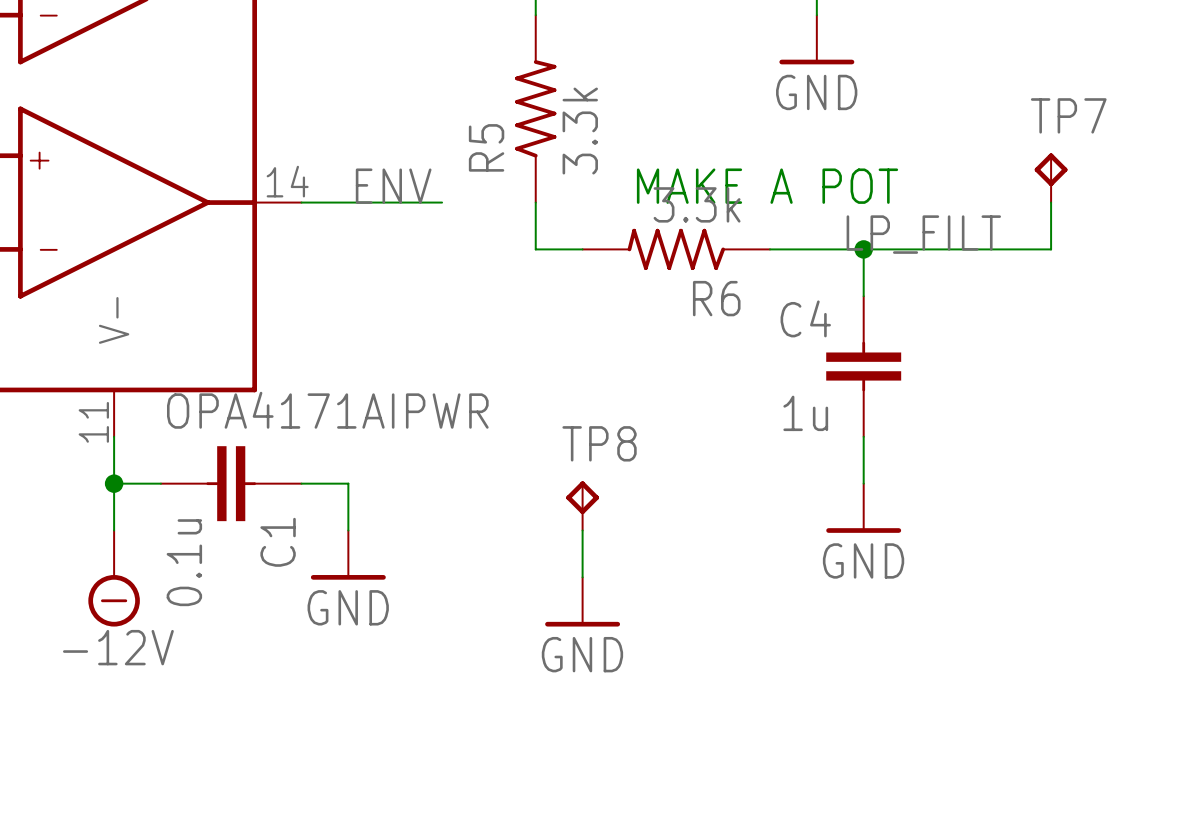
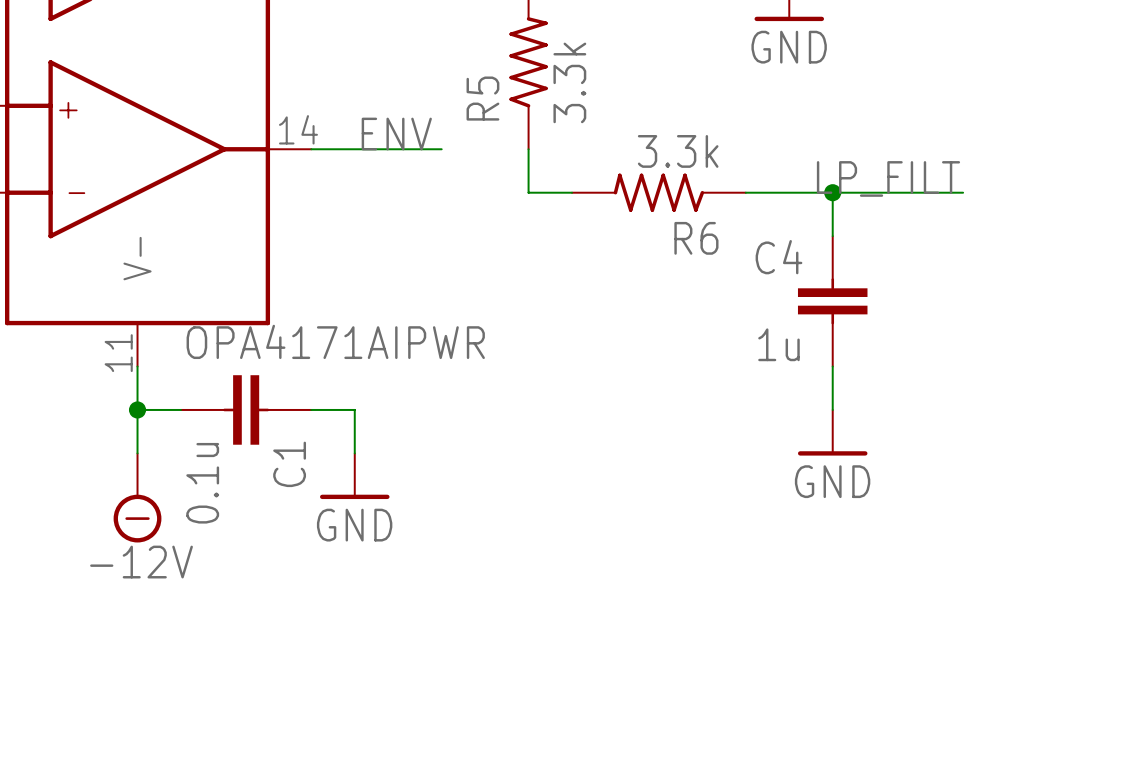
TP7: (1051, 177) -> none
text: MAKE A POT (767, 186) -> none
wire: (1051, 202) (1051, 249) (1004, 249) -> none
TP8: (582, 505) -> none
wire: (582, 530) (582, 577) -> none
power symbol: GND (582, 601) -> none

